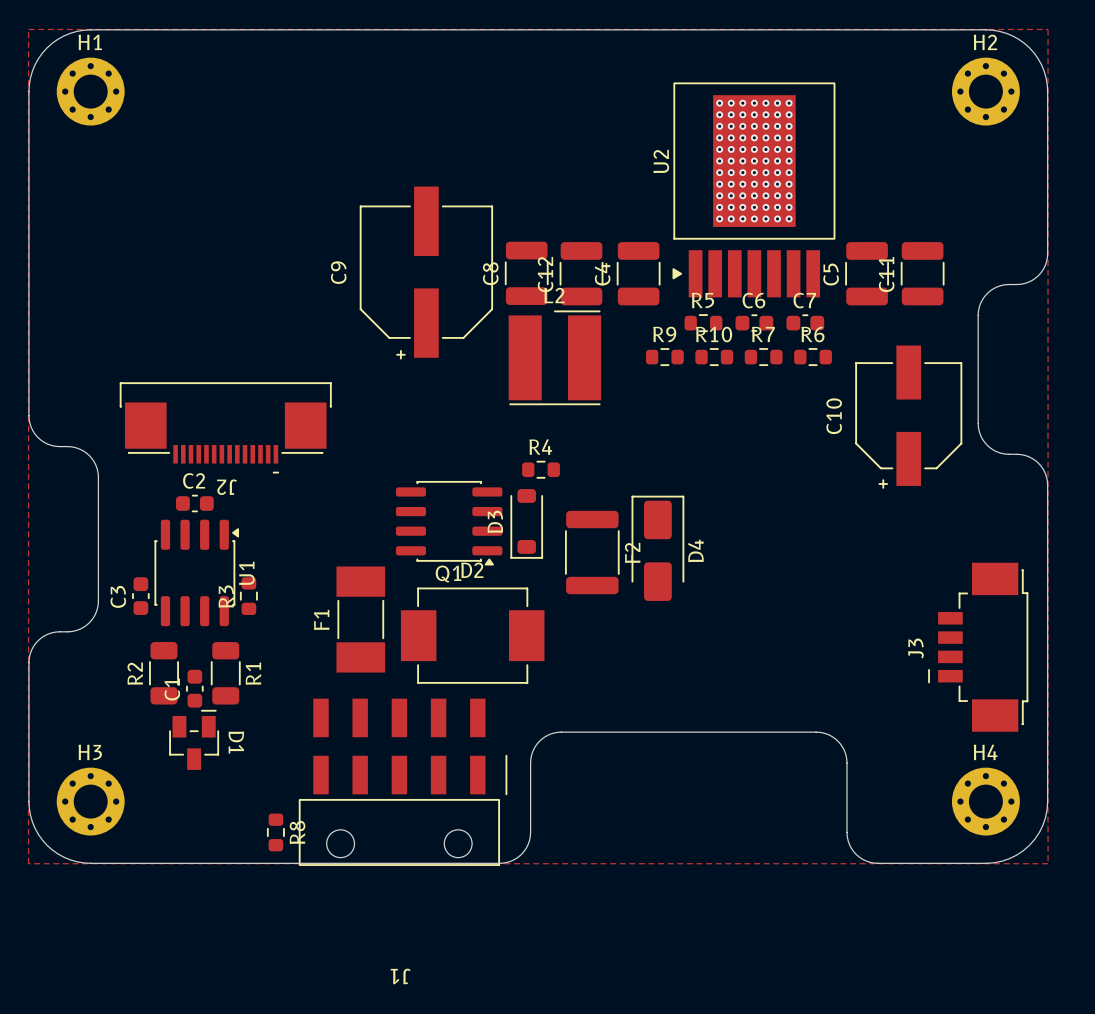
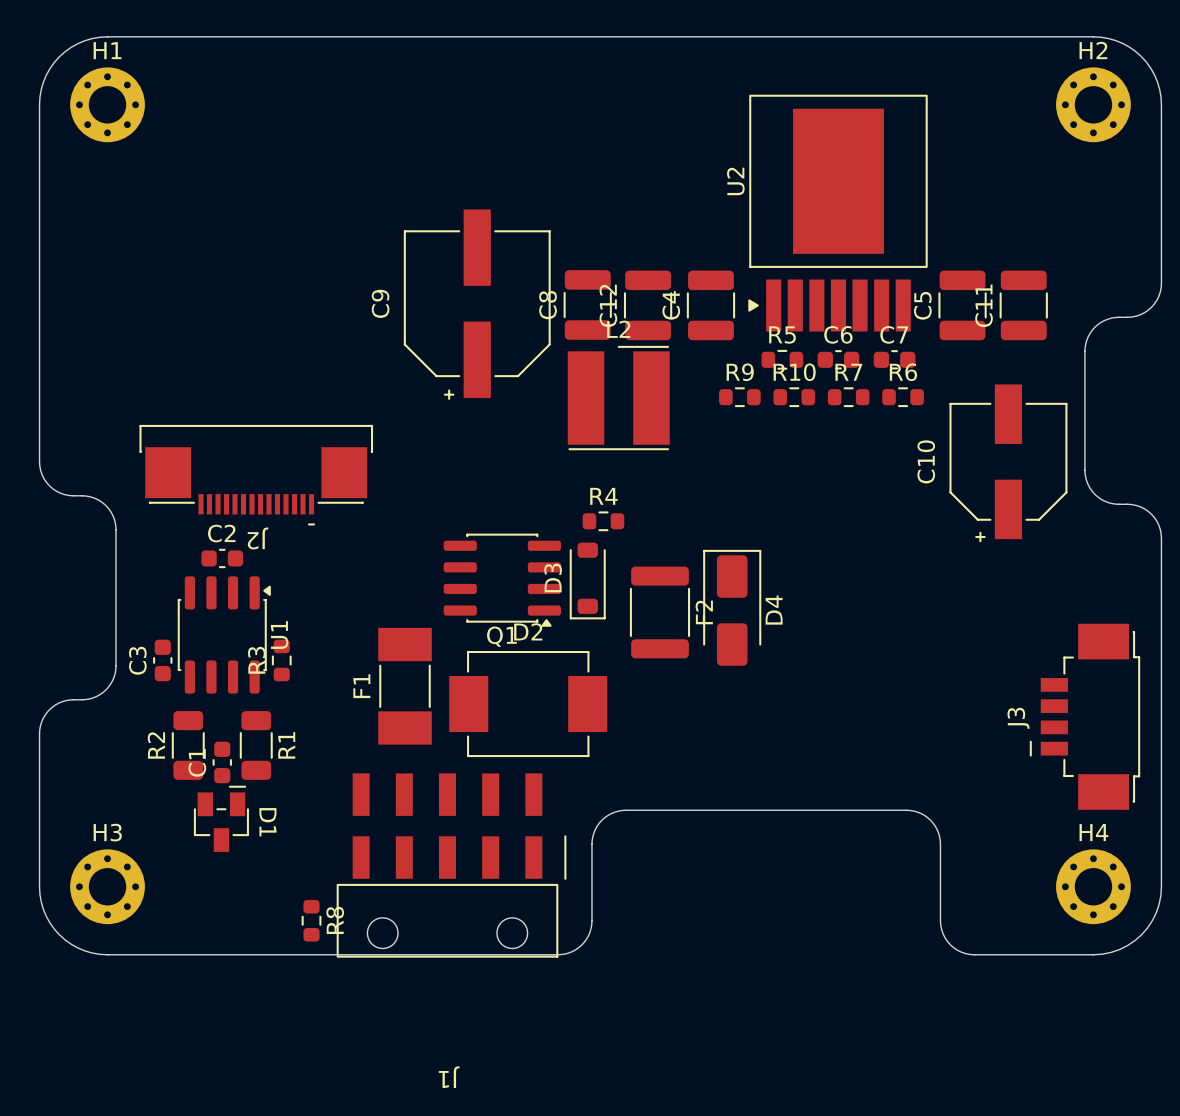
zone outline: (28, 29) (1048, 29) (1048, 863) (28, 863) (28, 29) -> none
via: (719, 103) -> none
via: (731, 103) -> none
via: (742, 103) -> none
via: (754, 103) -> none
via: (765, 103) -> none
via: (777, 103) -> none
via: (789, 103) -> none
via: (719, 114) -> none
via: (731, 114) -> none
via: (742, 114) -> none
via: (754, 114) -> none
via: (765, 114) -> none
via: (777, 114) -> none
via: (789, 114) -> none
via: (719, 126) -> none
via: (731, 126) -> none
via: (742, 126) -> none
via: (754, 126) -> none
via: (765, 126) -> none
via: (777, 126) -> none
via: (789, 126) -> none
via: (719, 137) -> none
via: (731, 137) -> none
via: (742, 137) -> none
via: (754, 137) -> none
via: (765, 137) -> none
via: (777, 137) -> none
via: (789, 137) -> none
via: (719, 149) -> none
via: (731, 149) -> none
via: (742, 149) -> none
via: (754, 149) -> none
via: (765, 149) -> none
via: (777, 149) -> none
via: (789, 149) -> none
via: (719, 161) -> none
via: (731, 161) -> none
via: (742, 161) -> none
via: (754, 161) -> none
via: (765, 161) -> none
via: (777, 161) -> none
via: (789, 161) -> none
via: (719, 172) -> none
via: (731, 172) -> none
via: (742, 172) -> none
via: (754, 172) -> none
via: (765, 172) -> none
via: (777, 172) -> none
via: (789, 172) -> none
via: (719, 184) -> none
via: (731, 184) -> none
via: (742, 184) -> none
via: (754, 184) -> none
via: (765, 184) -> none
via: (777, 184) -> none
via: (789, 184) -> none
via: (719, 195) -> none
via: (731, 195) -> none
via: (742, 195) -> none
via: (754, 195) -> none
via: (765, 195) -> none
via: (777, 195) -> none
via: (789, 195) -> none
via: (719, 207) -> none
via: (731, 207) -> none
via: (742, 207) -> none
via: (754, 207) -> none
via: (765, 207) -> none
via: (777, 207) -> none
via: (789, 207) -> none
via: (719, 218) -> none
via: (731, 218) -> none
via: (742, 218) -> none
via: (754, 218) -> none
via: (765, 218) -> none
via: (777, 218) -> none
via: (789, 218) -> none

